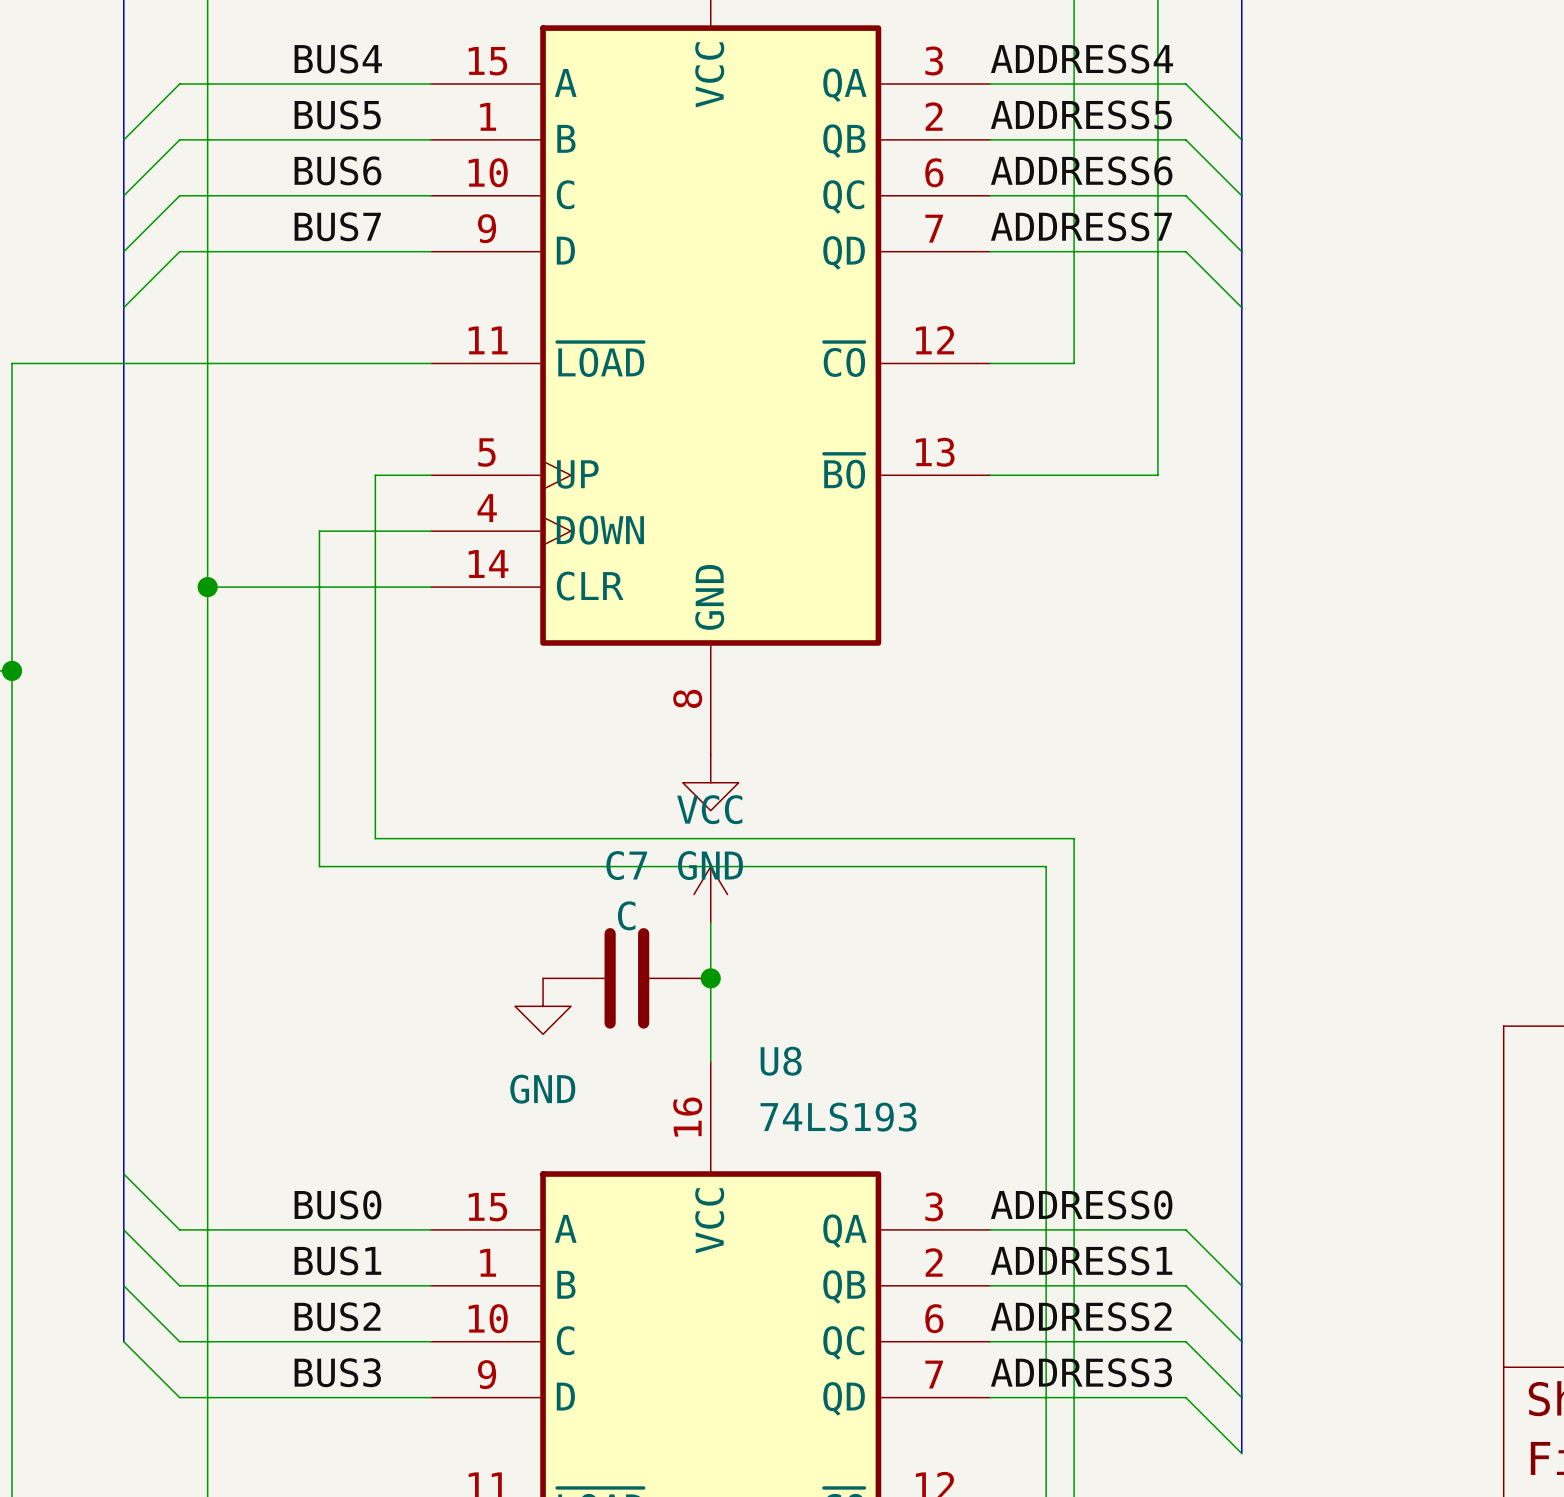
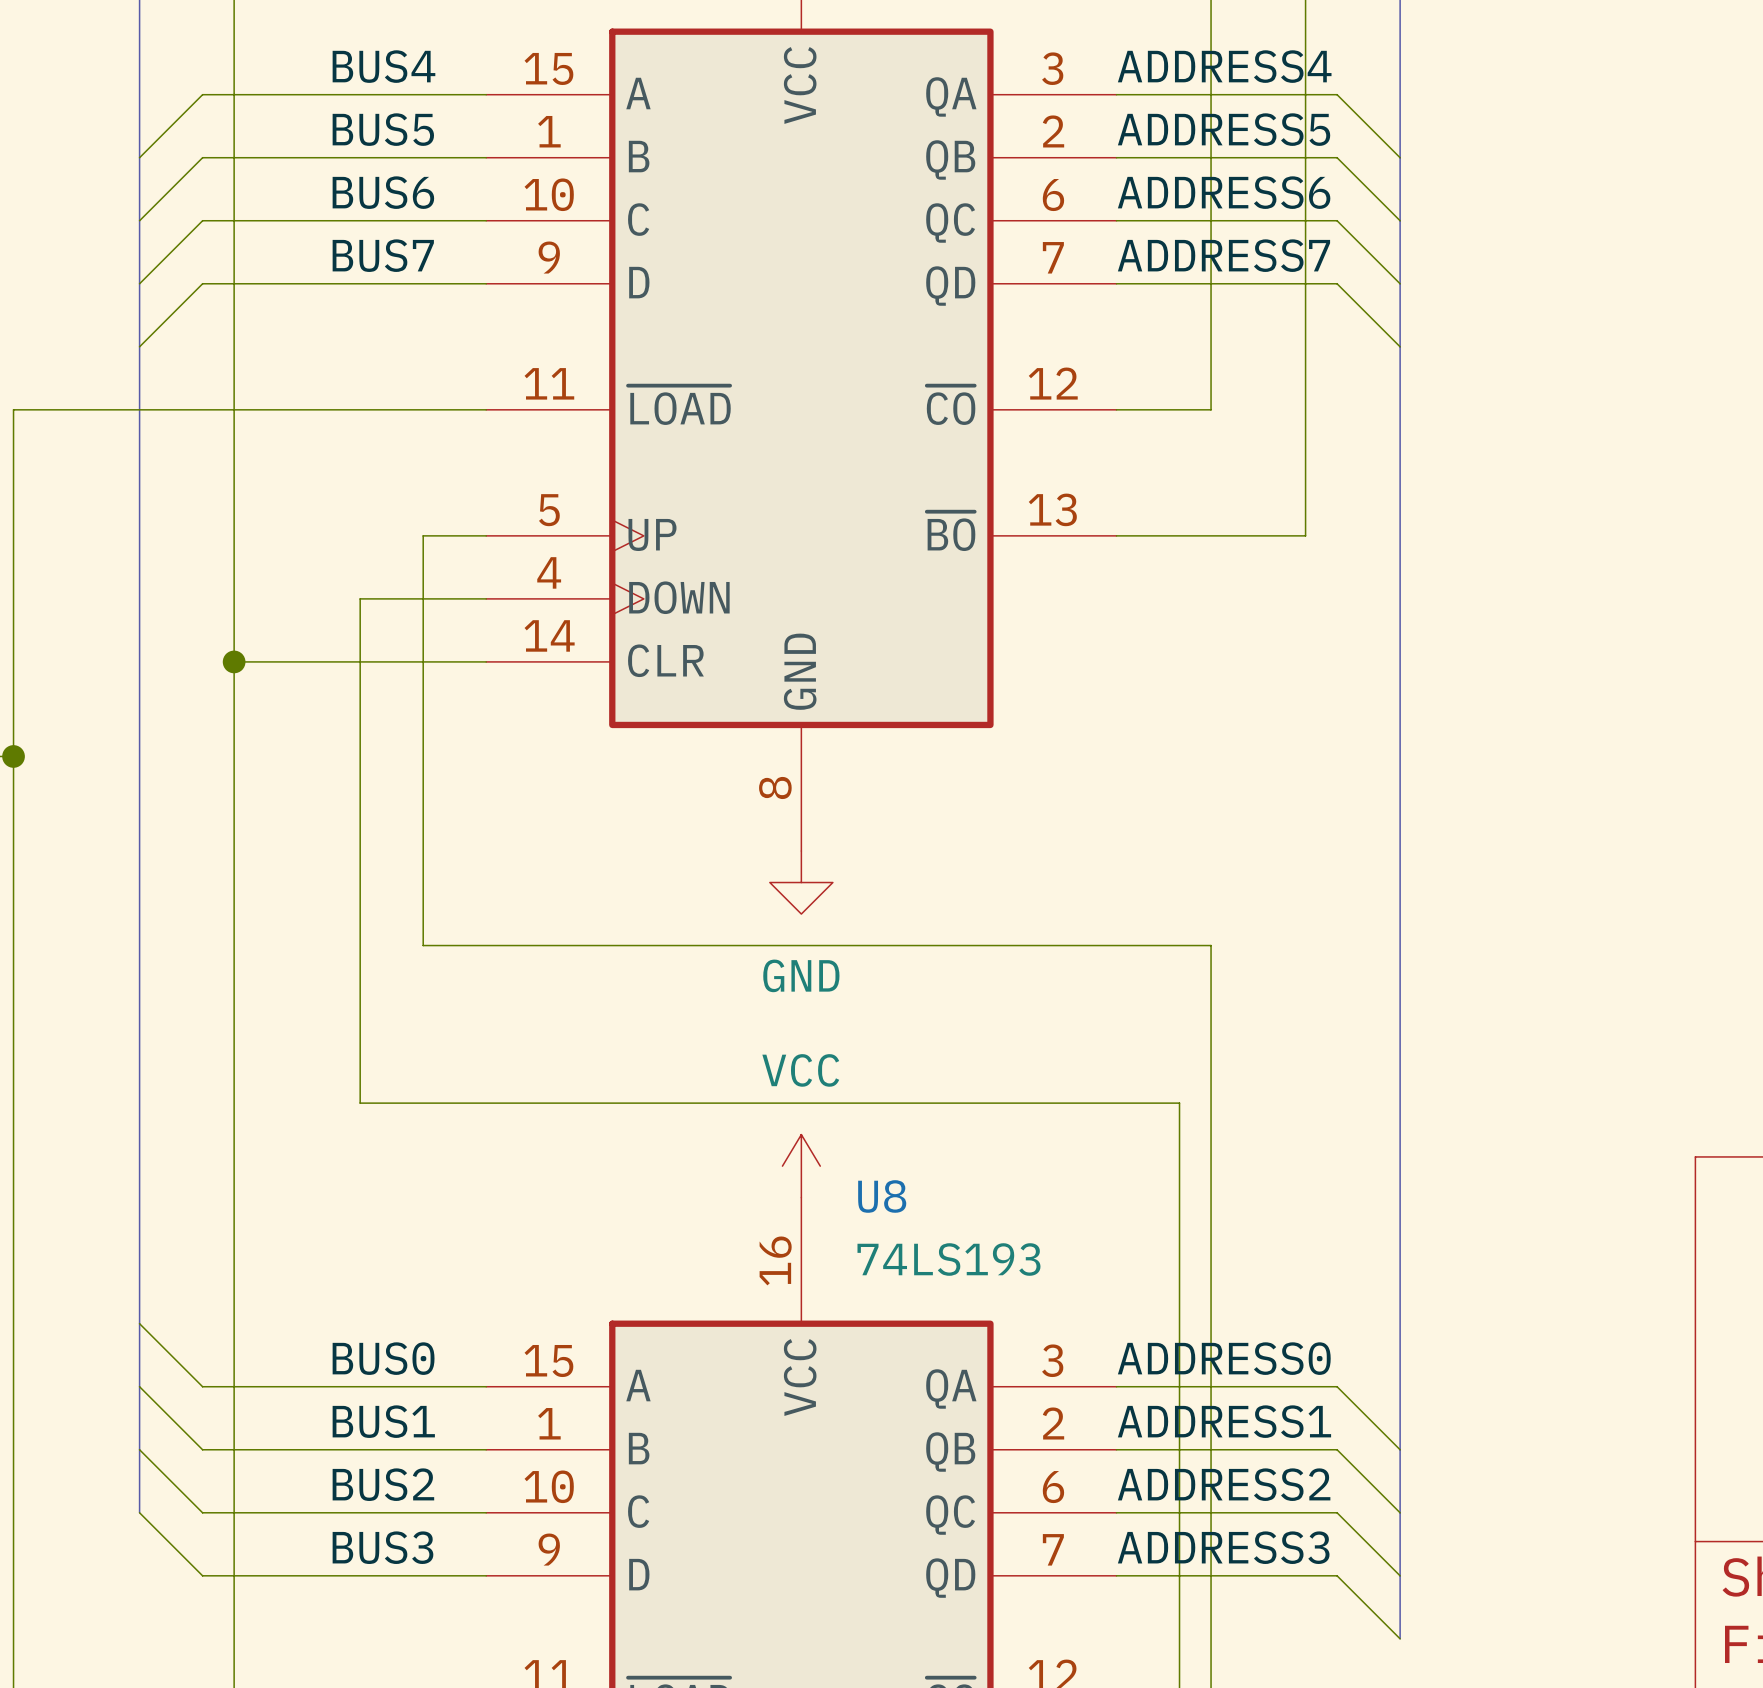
wire: (319, 866) (1046, 866) (1046, 978) -> (360, 977) (360, 1103) (1179, 1103)
power symbol position: VCC (710, 894) -> VCC (801, 1166)
wire: (710, 922) (710, 1062) -> none
C7: C (626, 978) -> none
junction: (710, 978) -> none
power symbol: GND (543, 1006) -> none

